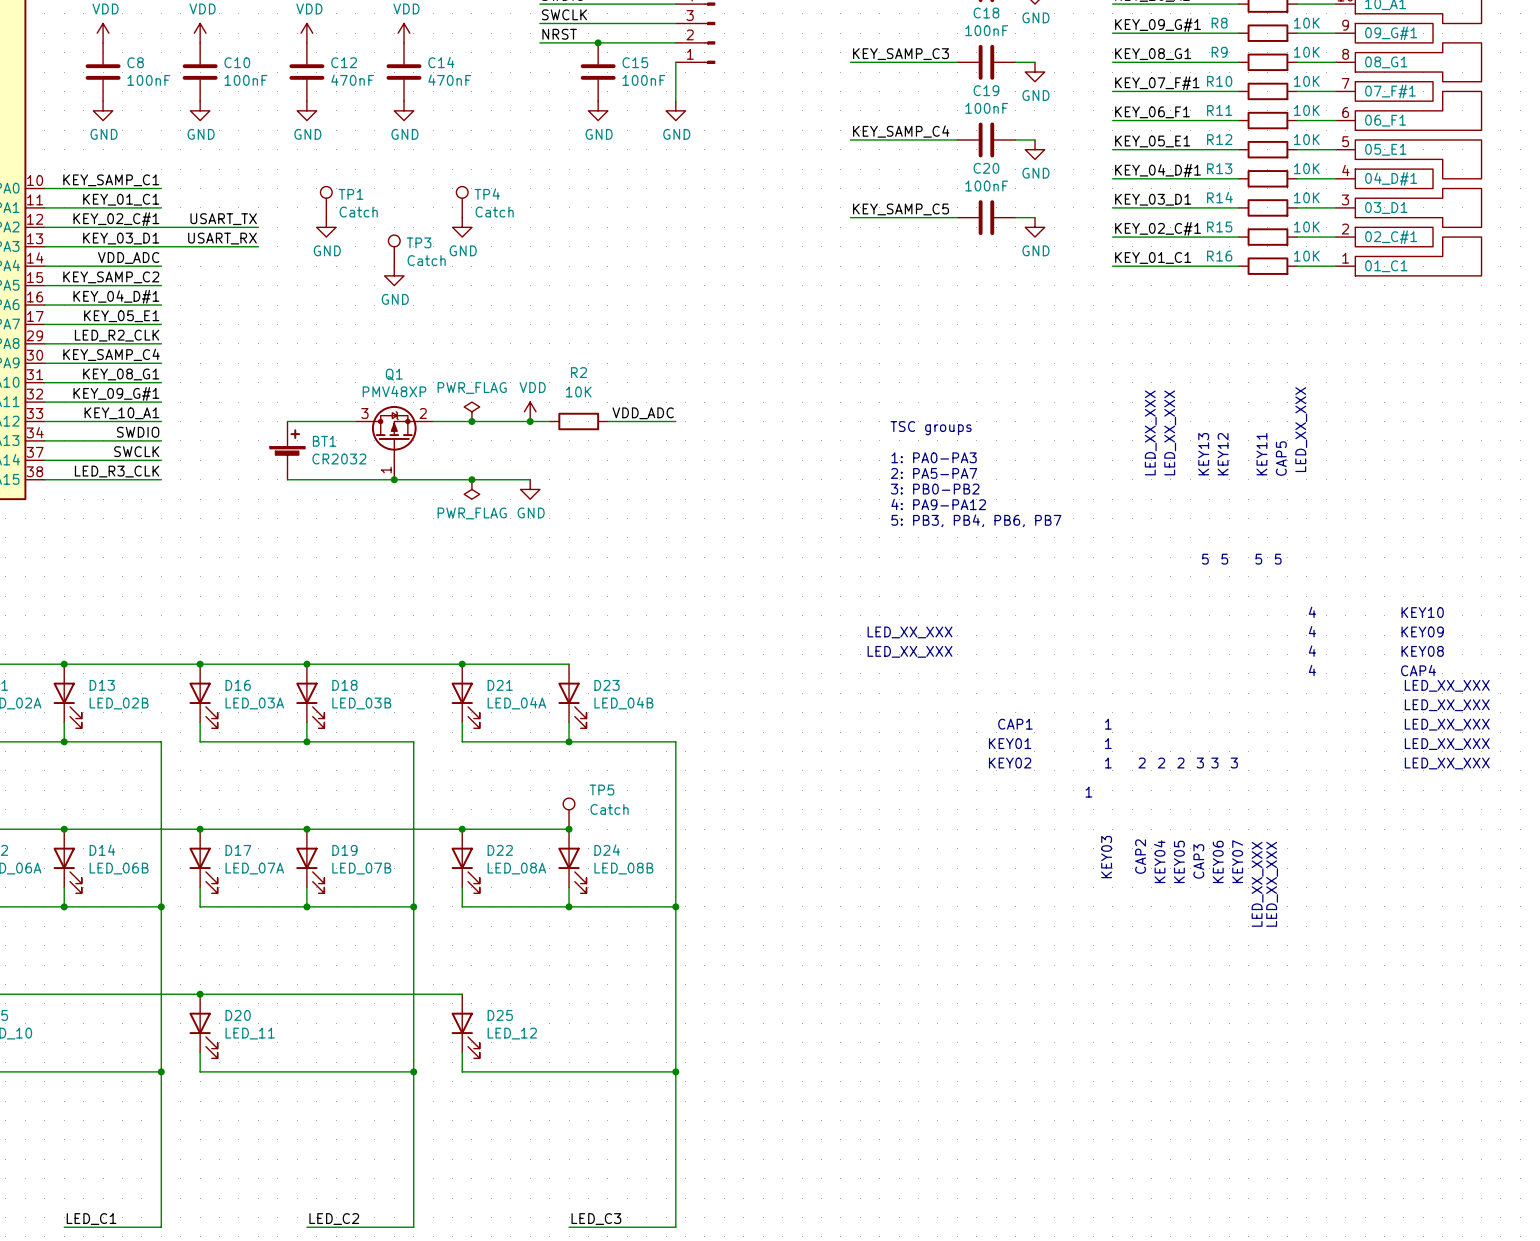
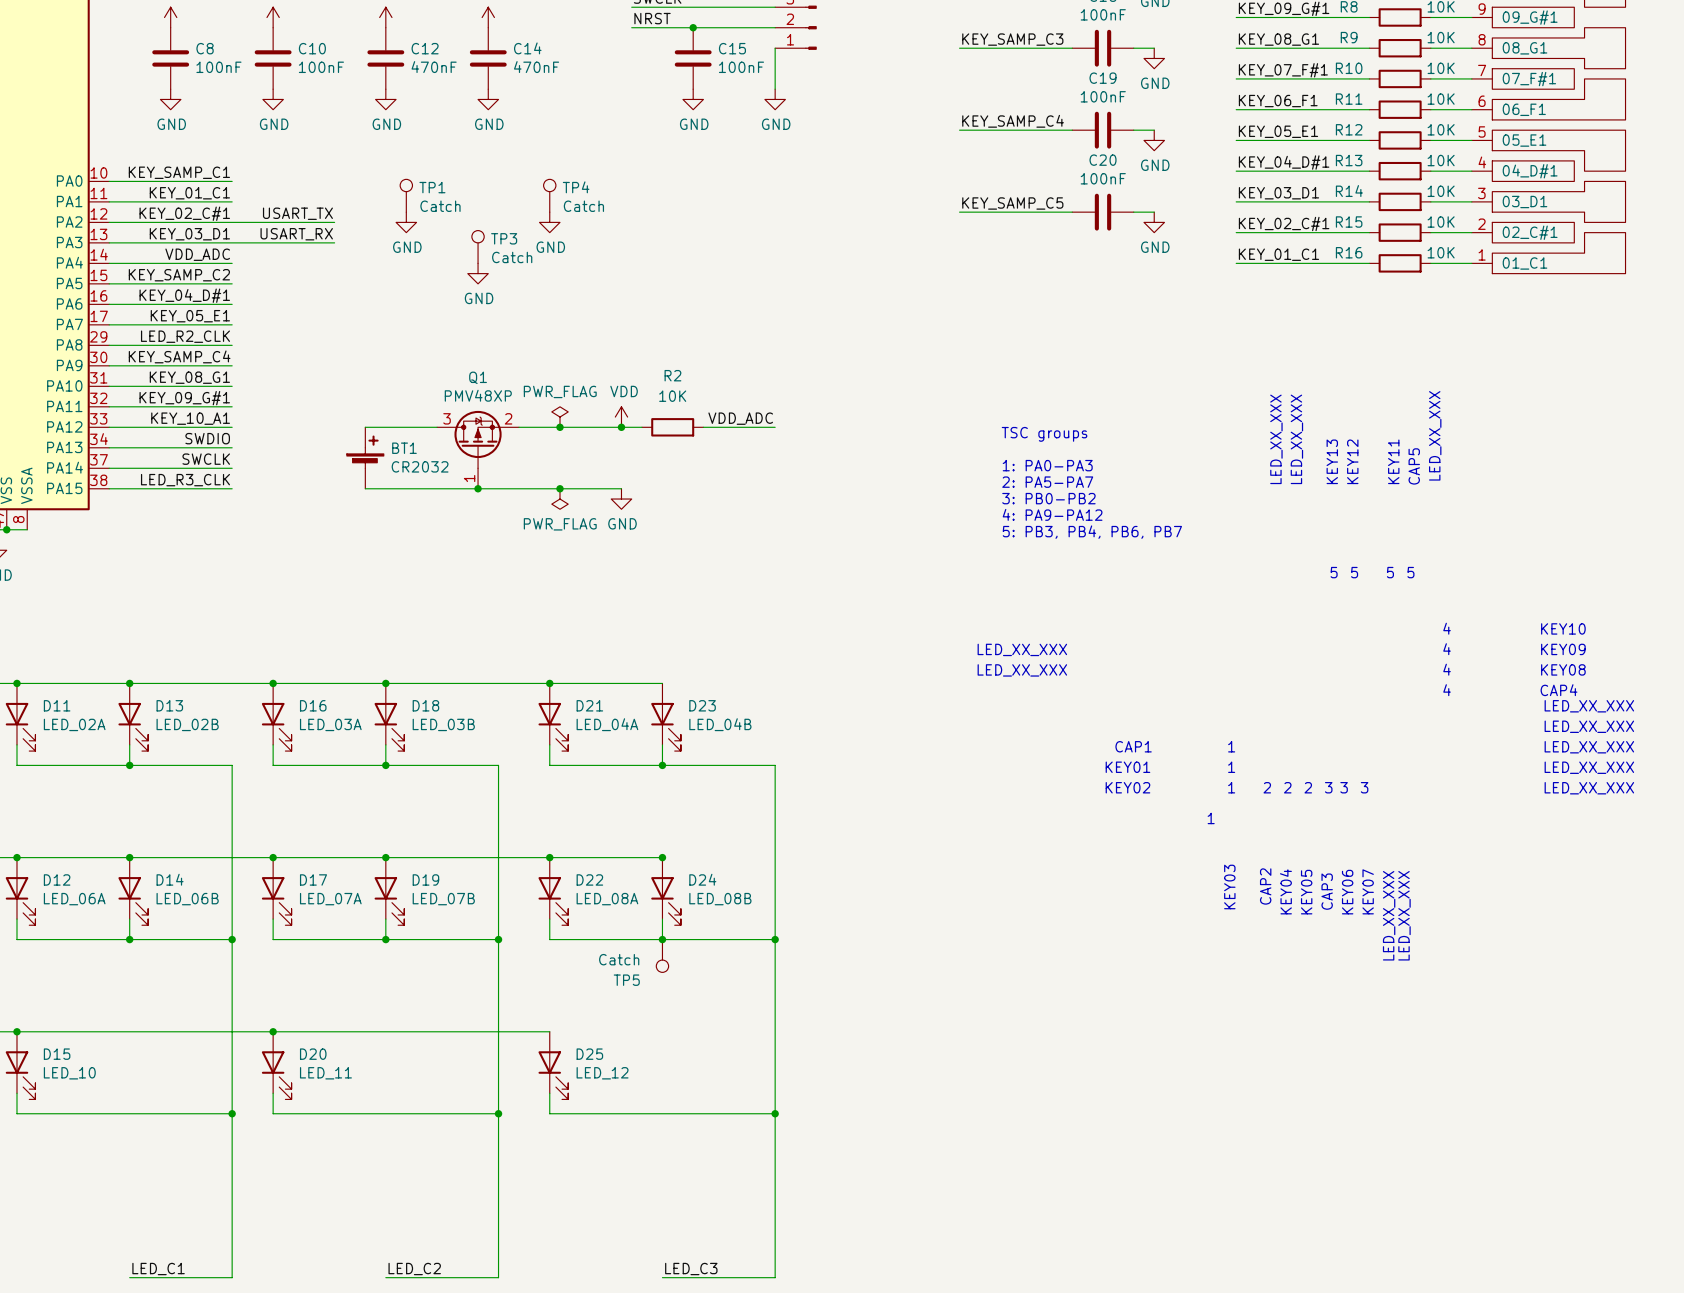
TP5 rotation: 0° (569, 803) -> 180° (662, 966)
TP5 position: (569, 813) -> (662, 955)

